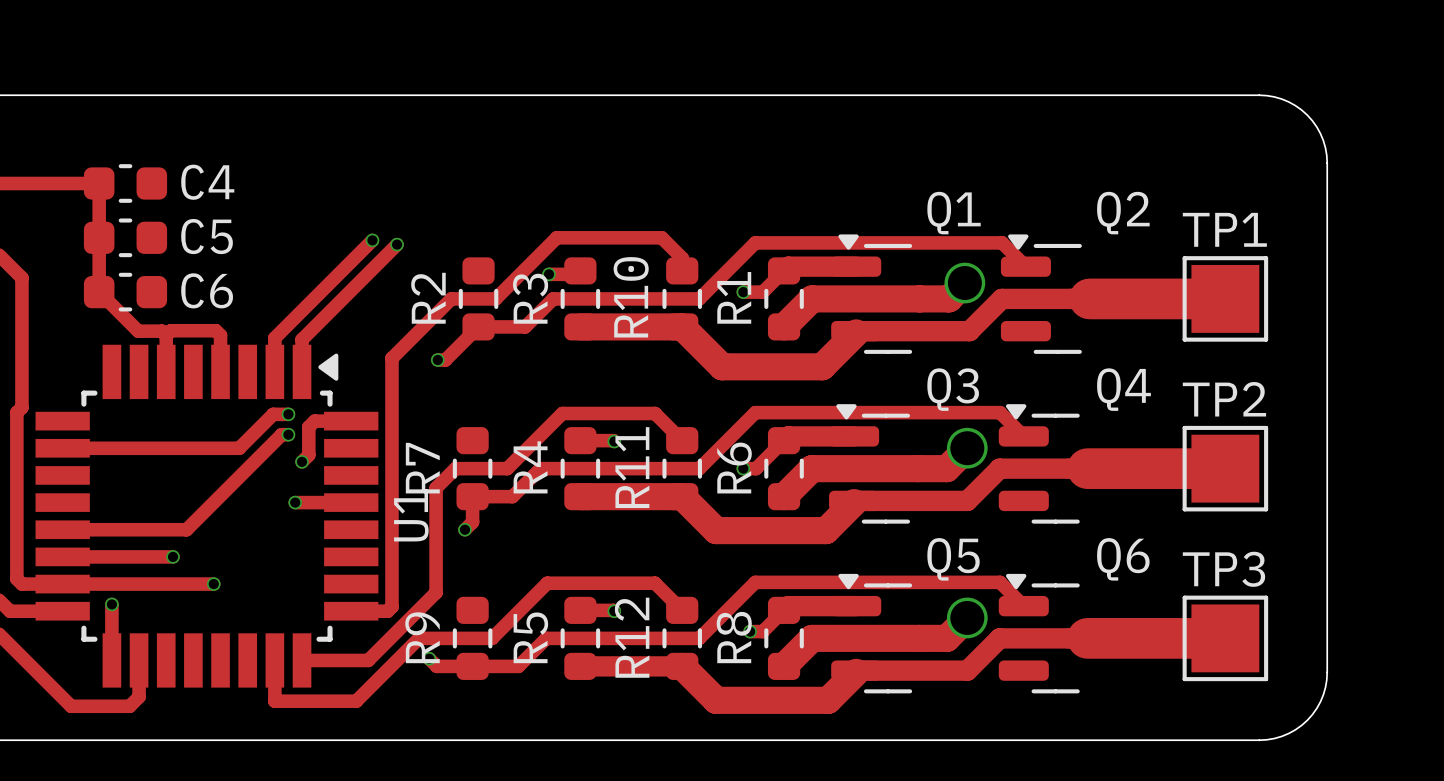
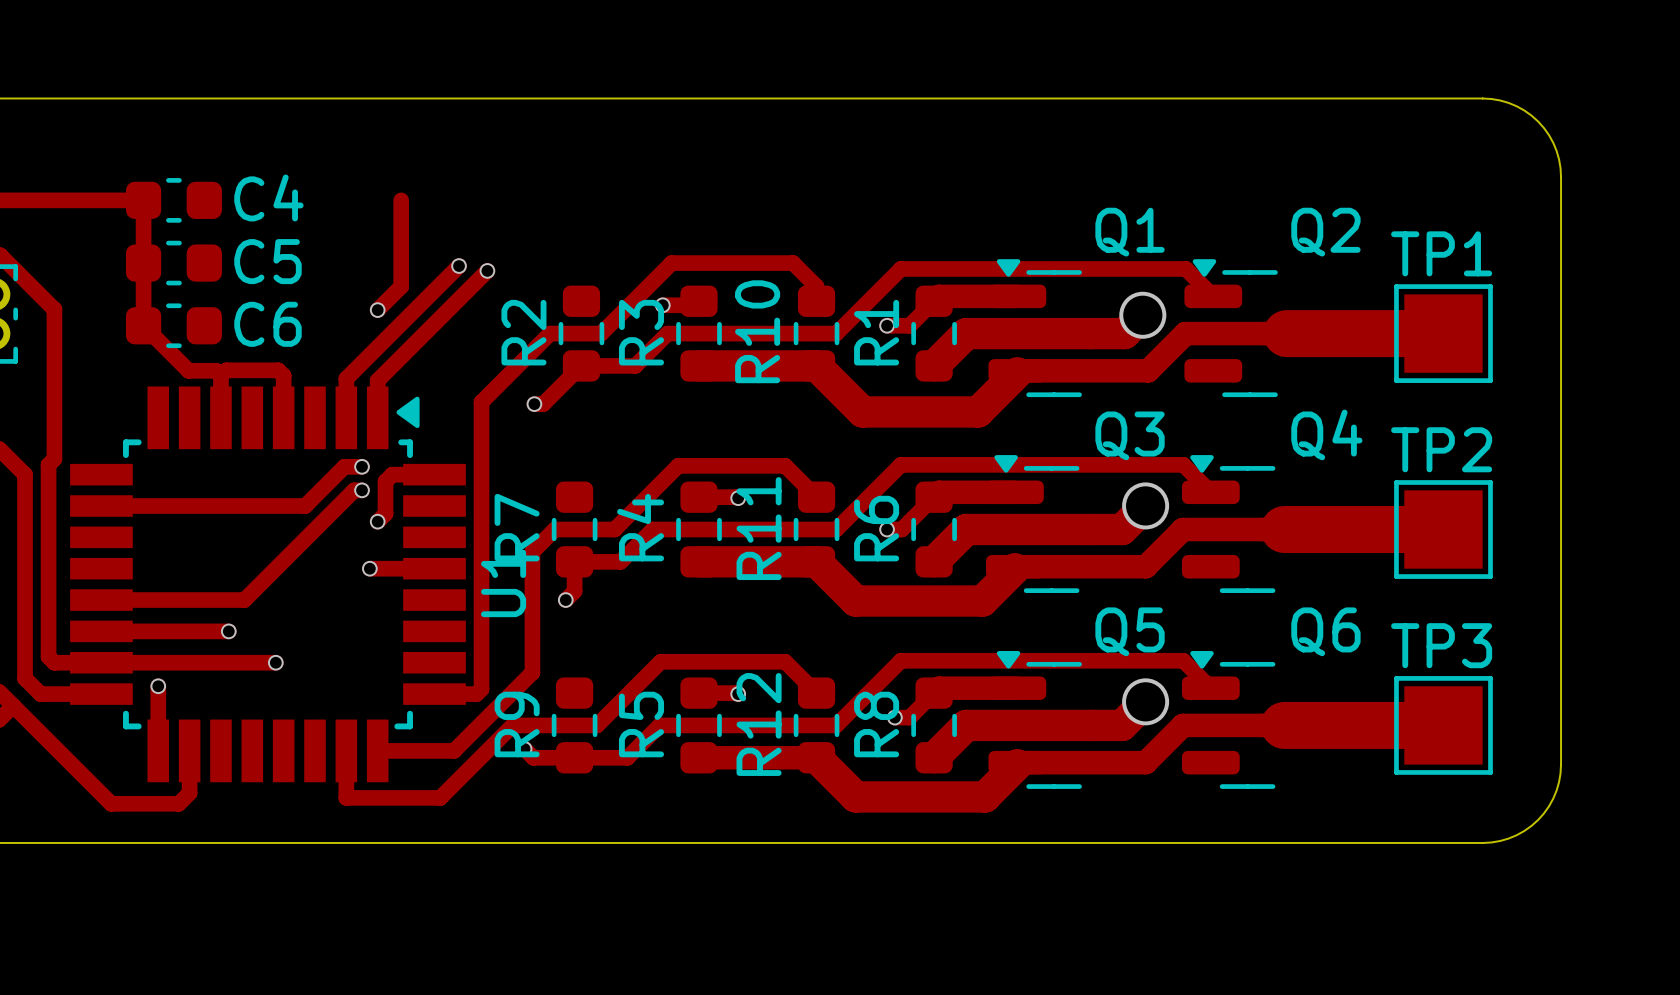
track: none -> (401, 200) (401, 286) (377, 310)
via: none -> (377, 310)

